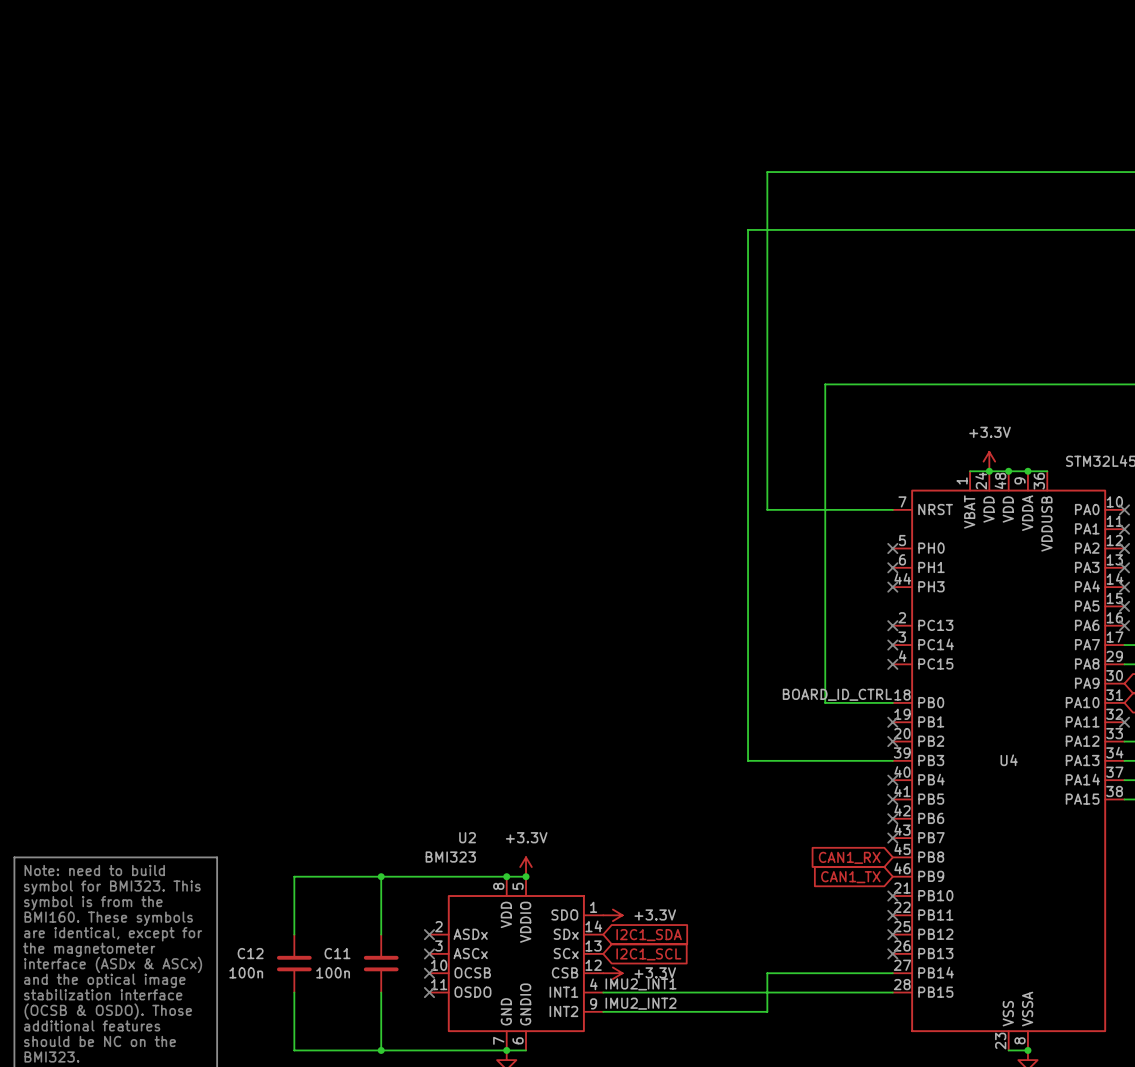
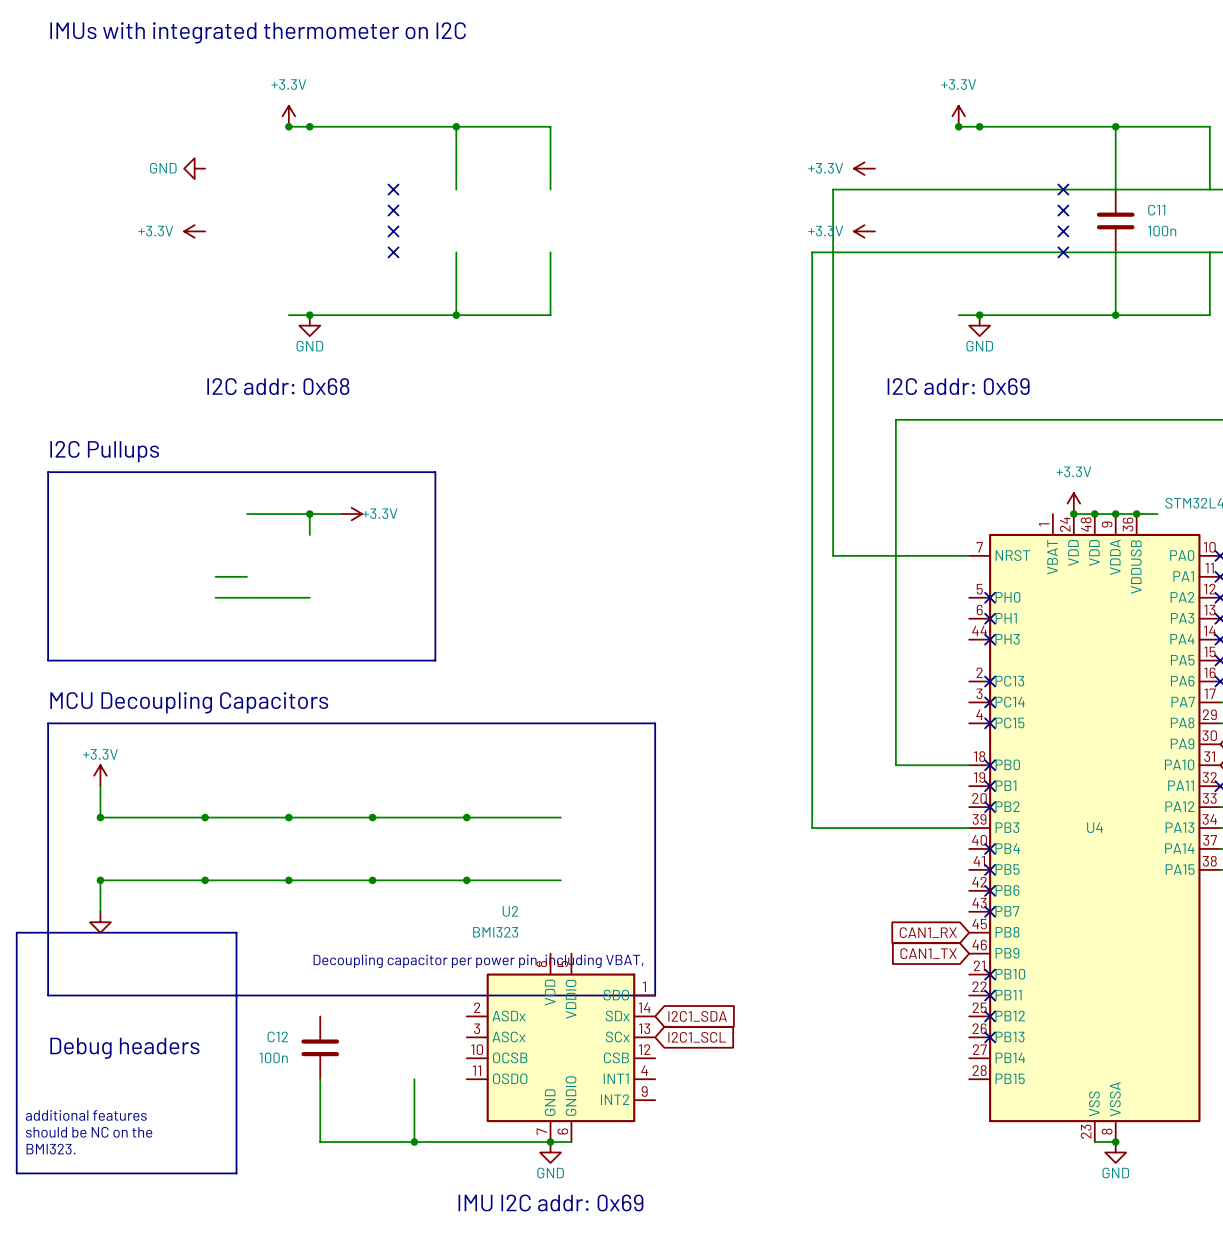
text: none -> IMUs with integrated thermometer on I2C (258, 32)
power symbol: none -> +3.3V (288, 116)
power symbol: none -> +3.3V (958, 116)
wire: none -> (288, 126) (550, 126) (550, 189)
junction: none -> (288, 126)
junction: none -> (309, 126)
wire: none -> (456, 126) (456, 189)
junction: none -> (456, 126)
wire: none -> (958, 126) (1209, 126) (1209, 189)
junction: none -> (958, 126)
junction: none -> (979, 126)
wire: none -> (1115, 126) (1115, 189)
junction: none -> (1115, 126)
power symbol: none -> GND (194, 168)
power symbol: none -> +3.3V (864, 168)
no-connect mark: none -> (393, 189)
no-connect mark: none -> (1063, 189)
no-connect mark: none -> (393, 210)
no-connect mark: none -> (1063, 210)
power symbol: none -> +3.3V (194, 231)
no-connect mark: none -> (393, 231)
power symbol: none -> +3.3V (864, 231)
no-connect mark: none -> (1063, 231)
no-connect mark: none -> (393, 252)
wire: none -> (456, 252) (456, 315)
wire: none -> (550, 252) (550, 315) (288, 315)
no-connect mark: none -> (1063, 252)
wire: none -> (1115, 252) (1115, 315)
wire: none -> (1209, 252) (1209, 315) (958, 315)
junction: none -> (309, 315)
junction: none -> (456, 315)
junction: none -> (979, 315)
junction: none -> (1115, 315)
power symbol: none -> GND (309, 325)
power symbol: none -> GND (979, 325)
text: none -> I2C addr: 0x68 (278, 386)
text: none -> I2C addr: 0x69 (958, 386)
text: none -> I2C Pullups (104, 451)
line: none -> (48, 472) (435, 472) (435, 660) (48, 660) (48, 472)
wire: none -> (246, 514) (341, 514)
wire: none -> (309, 514) (309, 534)
junction: none -> (309, 514)
power symbol: none -> +3.3V (351, 514)
wire: (970, 471) (989, 471) -> (1136, 514) (1157, 514)
junction: none -> (1136, 514)
wire: none -> (215, 576) (246, 576)
wire: none -> (215, 597) (309, 597)
no-connect mark: (892, 548) -> none
no-connect mark: none -> (990, 597)
no-connect mark: (892, 567) -> none
no-connect mark: none -> (990, 618)
no-connect mark: (892, 587) -> none
no-connect mark: none -> (990, 639)
no-connect mark: (892, 625) -> none
no-connect mark: none -> (990, 681)
text: none -> MCU Decoupling Capacitors (189, 702)
no-connect mark: (892, 645) -> none
no-connect mark: none -> (990, 702)
line: none -> (48, 723) (655, 723) (655, 995) (48, 995) (48, 723)
no-connect mark: (892, 664) -> none
no-connect mark: none -> (990, 723)
label: BOARD_ID_CTRL (837, 694) -> none
no-connect mark: none -> (990, 765)
power symbol: none -> +3.3V (100, 775)
wire: none -> (100, 786) (100, 817) (560, 817)
no-connect mark: (892, 722) -> none
no-connect mark: none -> (990, 786)
no-connect mark: (892, 741) -> none
no-connect mark: none -> (990, 807)
junction: none -> (100, 817)
junction: none -> (205, 817)
junction: none -> (288, 817)
junction: none -> (372, 817)
junction: none -> (466, 817)
no-connect mark: (892, 780) -> none
no-connect mark: none -> (990, 848)
no-connect mark: (892, 799) -> none
no-connect mark: none -> (990, 869)
junction: none -> (100, 880)
junction: none -> (205, 880)
junction: none -> (288, 880)
junction: none -> (372, 880)
junction: none -> (466, 880)
wire: none -> (560, 880) (100, 880) (100, 911)
no-connect mark: (892, 818) -> none
no-connect mark: none -> (990, 890)
no-connect mark: (892, 838) -> none
no-connect mark: none -> (990, 911)
power symbol: none -> (100, 922)
power symbol: +3.3V (526, 867) -> none
text: Note: need to build (94, 870) -> none
wire: (381, 876) (381, 934) -> none
junction: (381, 876) -> none
junction: (506, 876) -> none
wire: (526, 876) (294, 876) (294, 934) -> none
junction: (526, 876) -> none
text: none -> Decoupling capacitor per power pin, including VBAT, (478, 961)
text: symbol for BMI323. This (112, 887) -> none
no-connect mark: (892, 896) -> none
no-connect mark: none -> (990, 974)
text: symbol is from the (93, 903) -> none
power symbol: +3.3V (612, 915) -> none
no-connect mark: (892, 915) -> none
no-connect mark: none -> (990, 995)
text: BMI160. These symbols (108, 918) -> none
text: are identical, except for (113, 934) -> none
no-connect mark: (429, 934) -> none
no-connect mark: (892, 934) -> none
no-connect mark: none -> (990, 1016)
text: the magnetometer (89, 949) -> none
C11 name position: C11 (337, 953) -> C11 (1156, 210)
no-connect mark: (429, 953) -> none
no-connect mark: (892, 953) -> none
no-connect mark: none -> (990, 1037)
C11 position: (381, 963) -> (1115, 220)
text: interface (ASDx & ASCx) (113, 964) -> none
text: none -> Debug headers (124, 1048)
C11 value position: 100n (333, 972) -> 100n (1162, 231)
no-connect mark: (429, 973) -> none
power symbol: +3.3V (612, 973) -> none
wire: (892, 973) (767, 973) (767, 1011) (603, 1011) -> none
text: and the optical image (104, 980) -> none
label: IMU2_INT1 (641, 984) -> none
no-connect mark: (429, 992) -> none
wire: (603, 992) (892, 992) -> none
text: stabilization interface (103, 994) -> none
label: IMU2_INT2 (641, 1003) -> none
text: (OCSB & OSDO). Those (108, 1011) -> none

